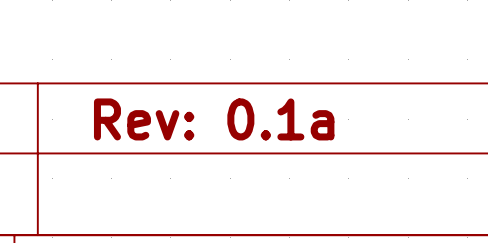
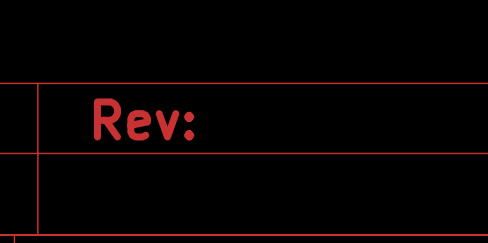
title block: Rev: 0.1a (214, 119) -> Rev: (144, 119)

